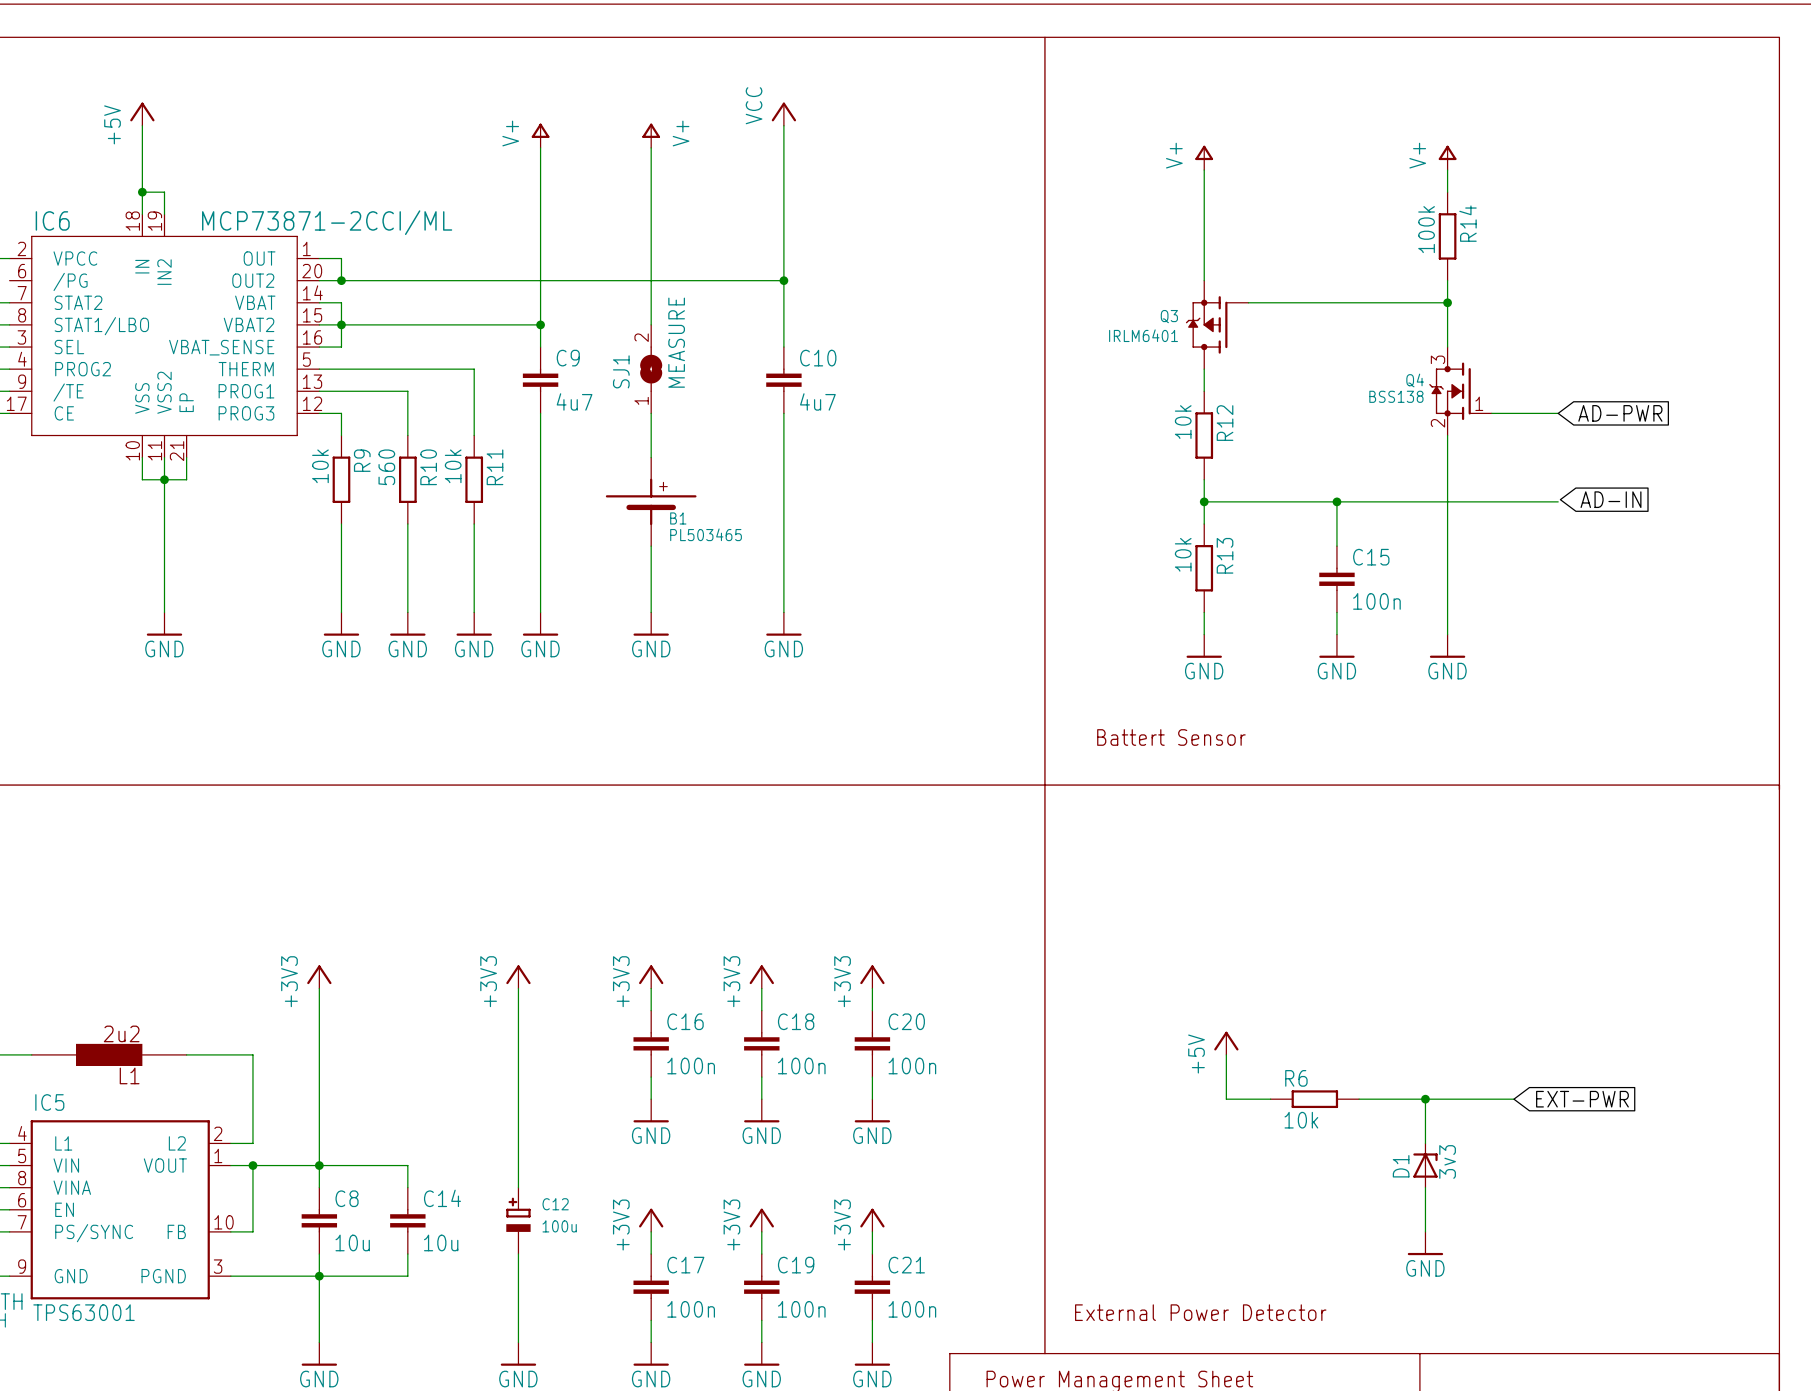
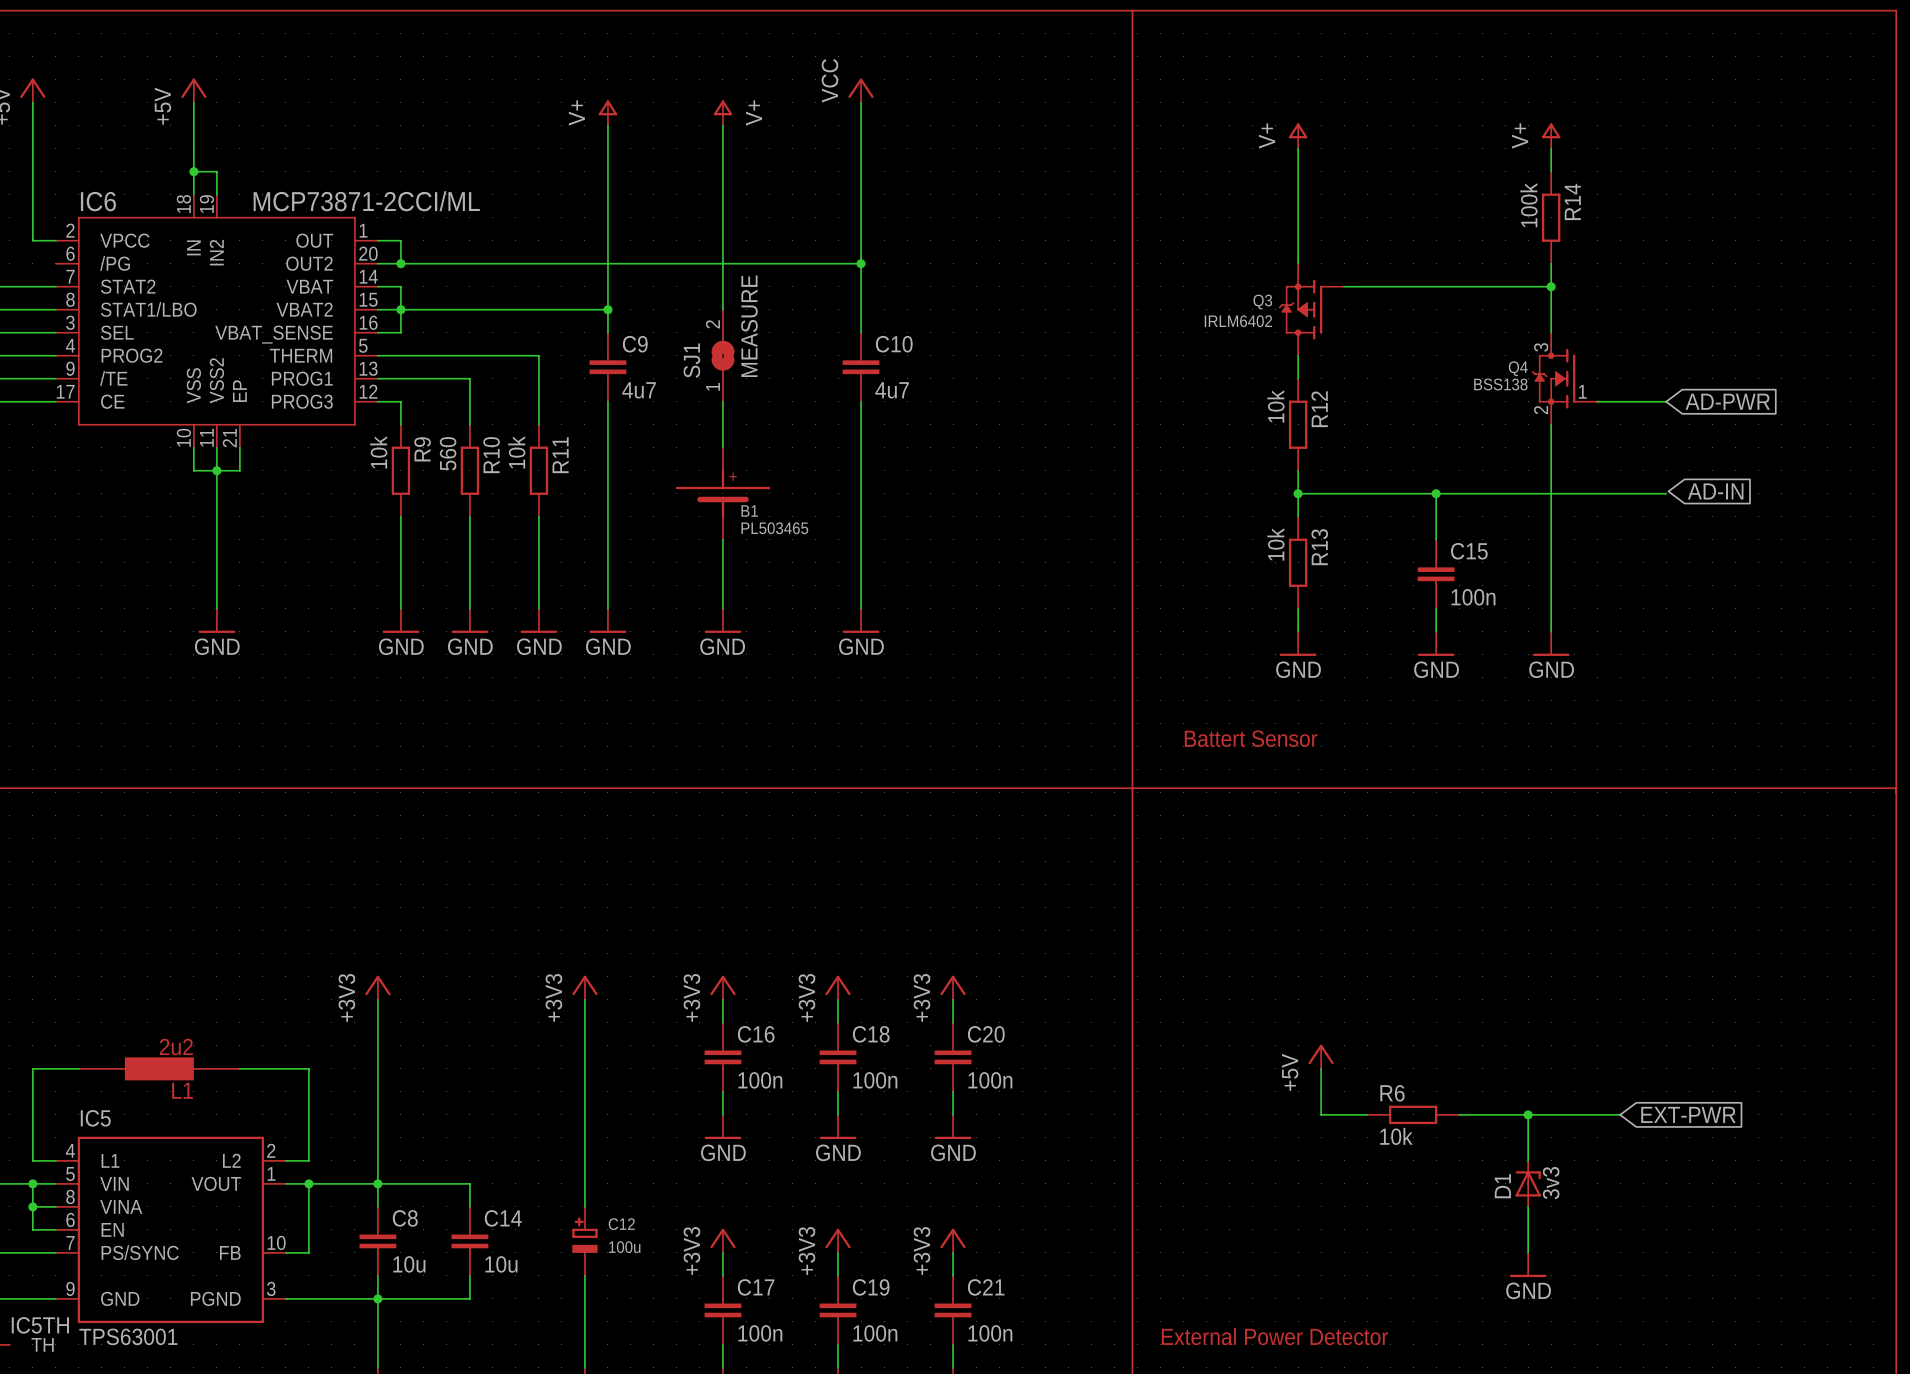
Q3 value: IRLM6401 (1143, 335) -> IRLM6402 (1238, 321)

